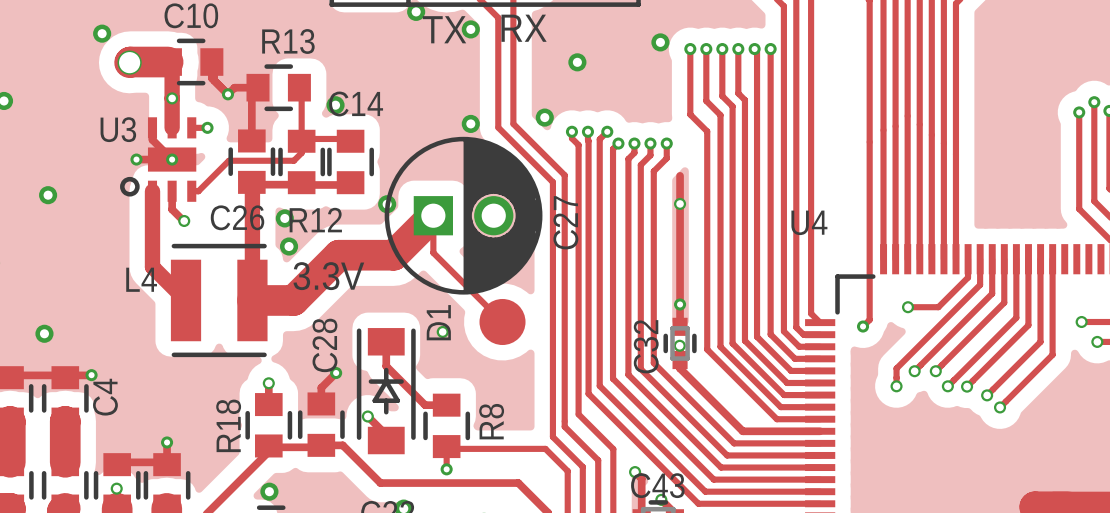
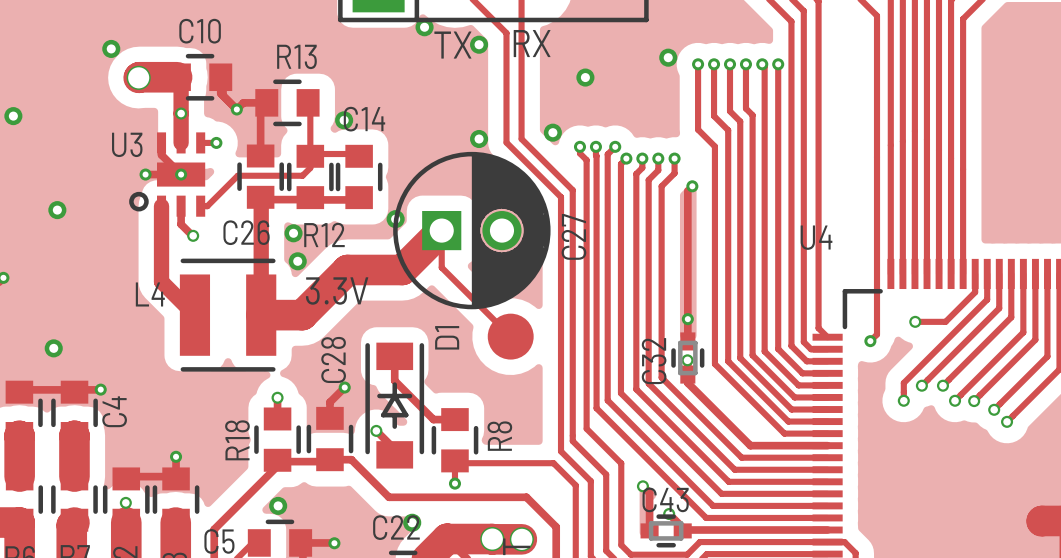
via: none -> (692, 186)
via: (680, 203) -> none
via: (442, 331) -> none

